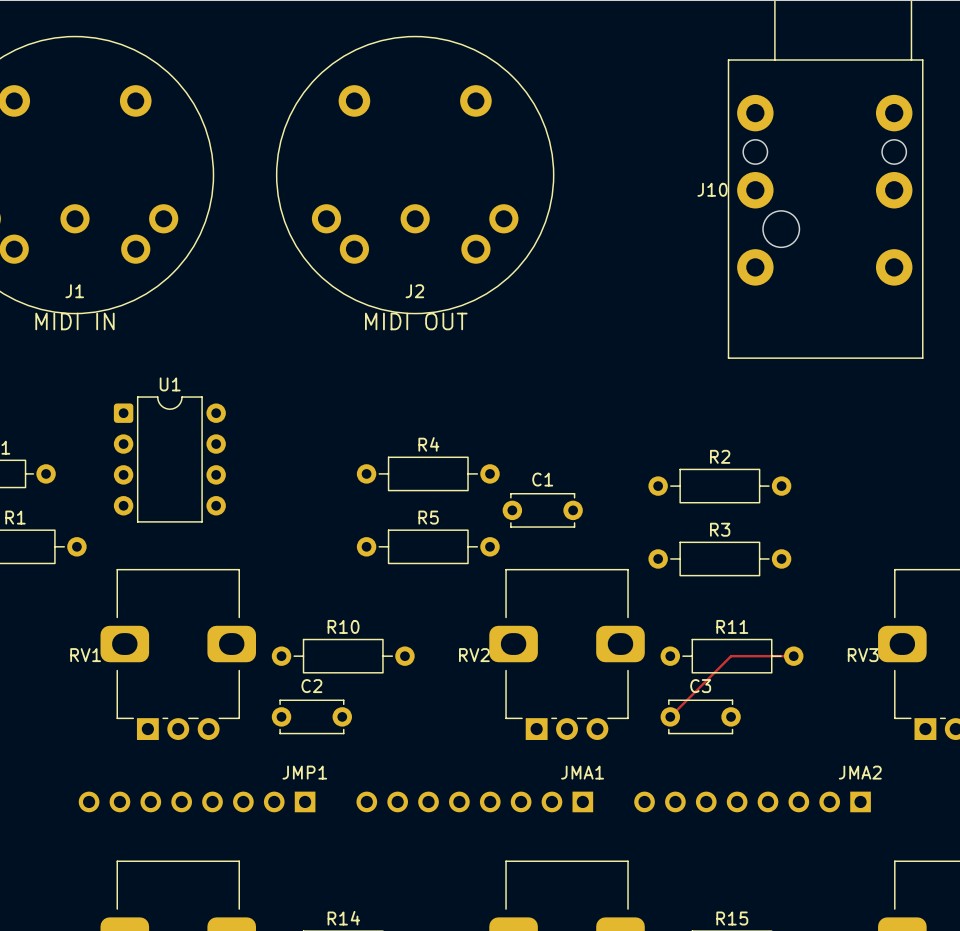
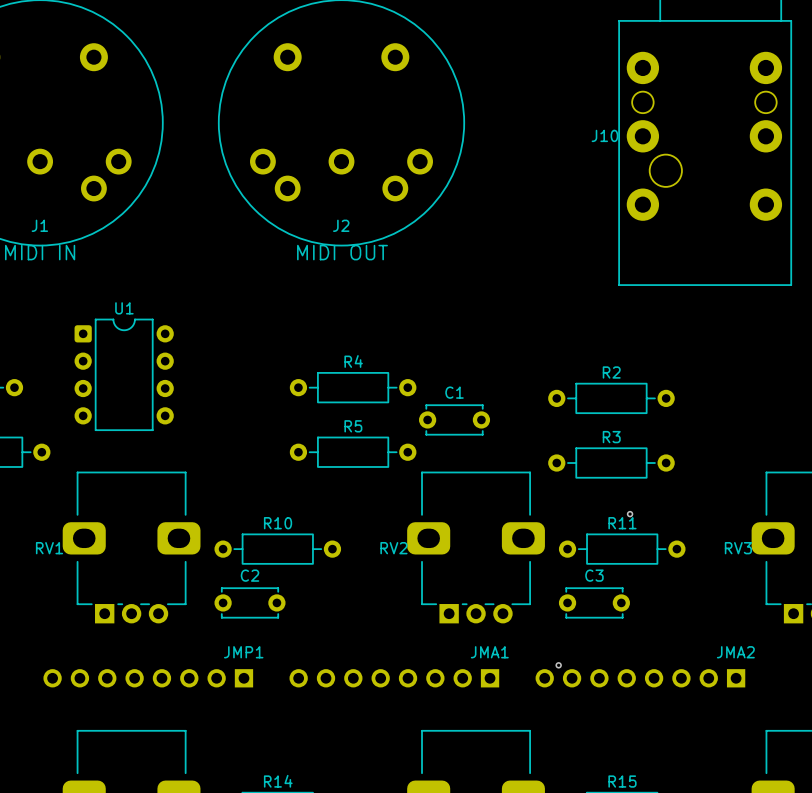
via: none -> (630, 514)
track: (793, 656) (731, 656) (670, 716) -> none
via: none -> (558, 665)

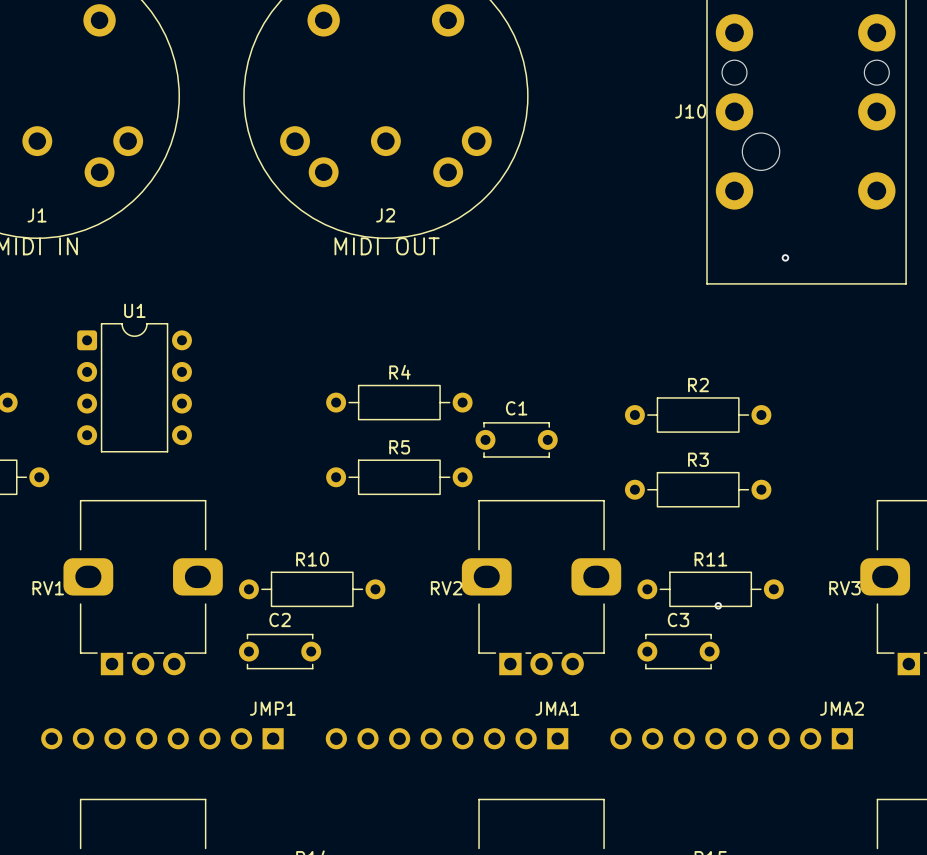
via: none -> (785, 257)
via position: (630, 514) -> (718, 605)
via: (558, 665) -> none

